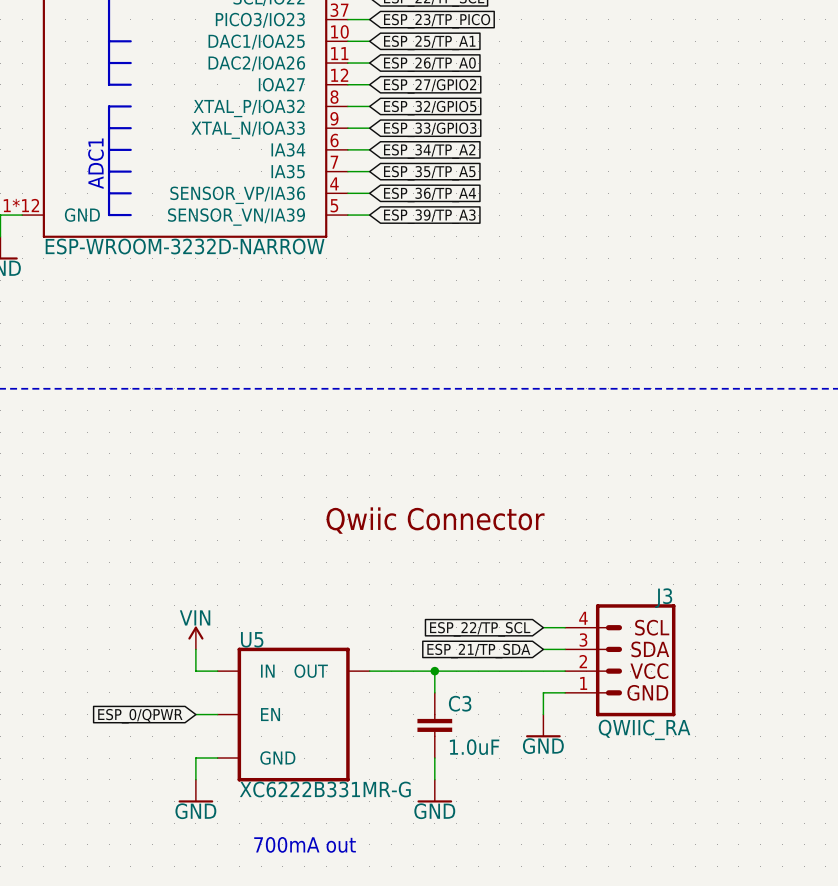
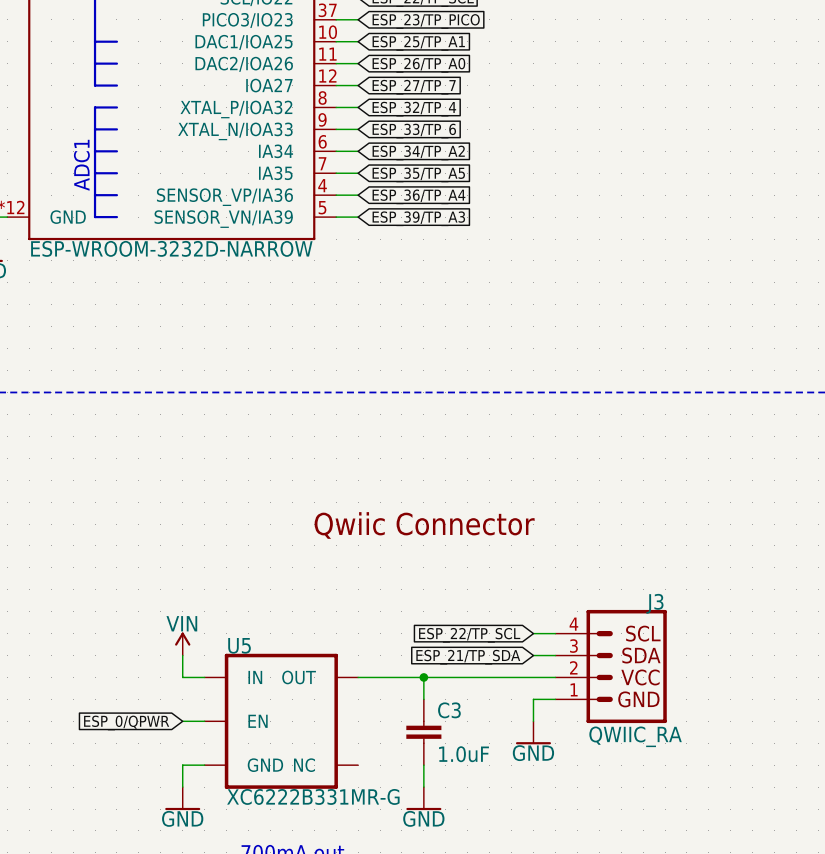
global label: ESP_27/GPIO2 (430, 86) -> ESP_27/TP_7 (414, 87)
global label: ESP_32/GPIO5 (430, 108) -> ESP_32/TP_4 (414, 109)
global label: ESP_33/GPIO3 (430, 129) -> ESP_33/TP_6 (414, 131)
U5 symbol: [217, 647, 370, 782] -> [204, 653, 359, 789]

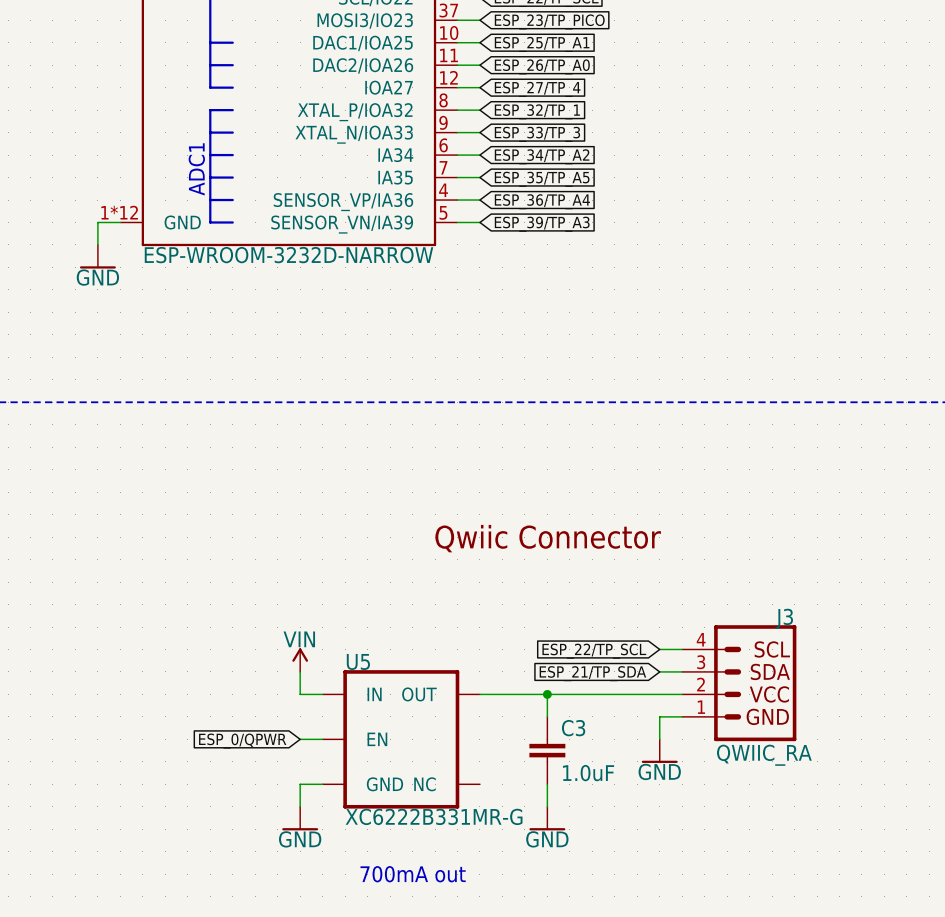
part pin name: PICO3/IO23 (247, 20) -> MOSI3/IO23 (365, 20)
global label: ESP_27/TP_7 (414, 87) -> ESP_27/TP_4 (537, 89)
global label: ESP_32/TP_4 (414, 109) -> ESP_32/TP_1 (537, 111)
global label: ESP_33/TP_6 (414, 131) -> ESP_33/TP_3 (537, 134)

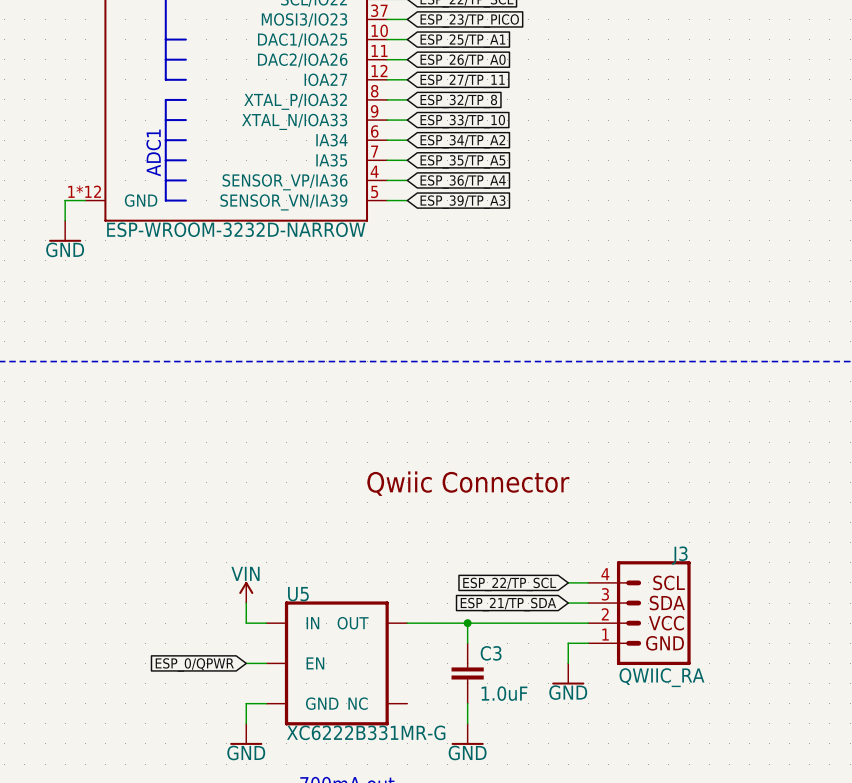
global label: ESP_27/TP_4 (537, 89) -> ESP_27/TP_11 (462, 81)
global label: ESP_32/TP_1 (537, 111) -> ESP_32/TP_8 (458, 101)
global label: ESP_33/TP_3 (537, 134) -> ESP_33/TP_10 (462, 121)

